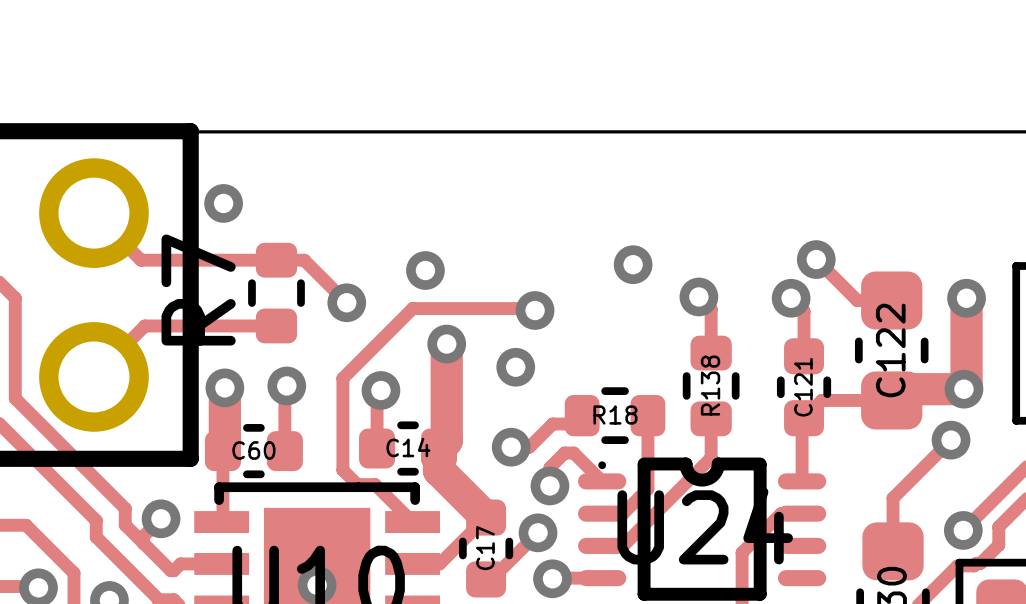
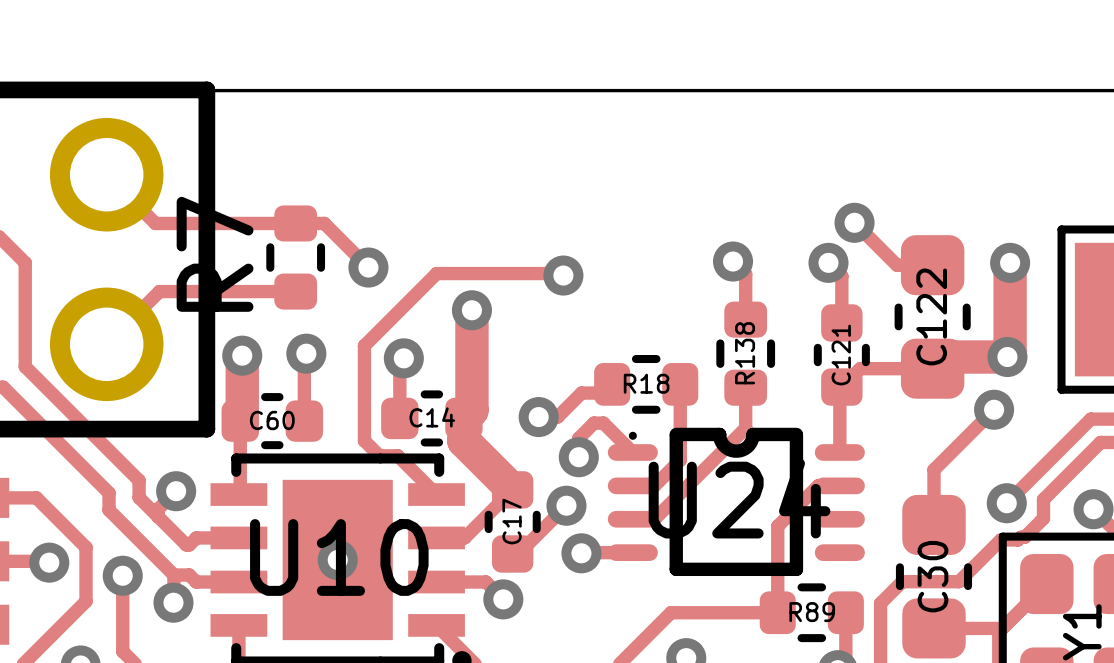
via: (223, 203) -> none
via: (633, 264) -> none
via: (425, 270) -> none
via: (515, 367) -> none

